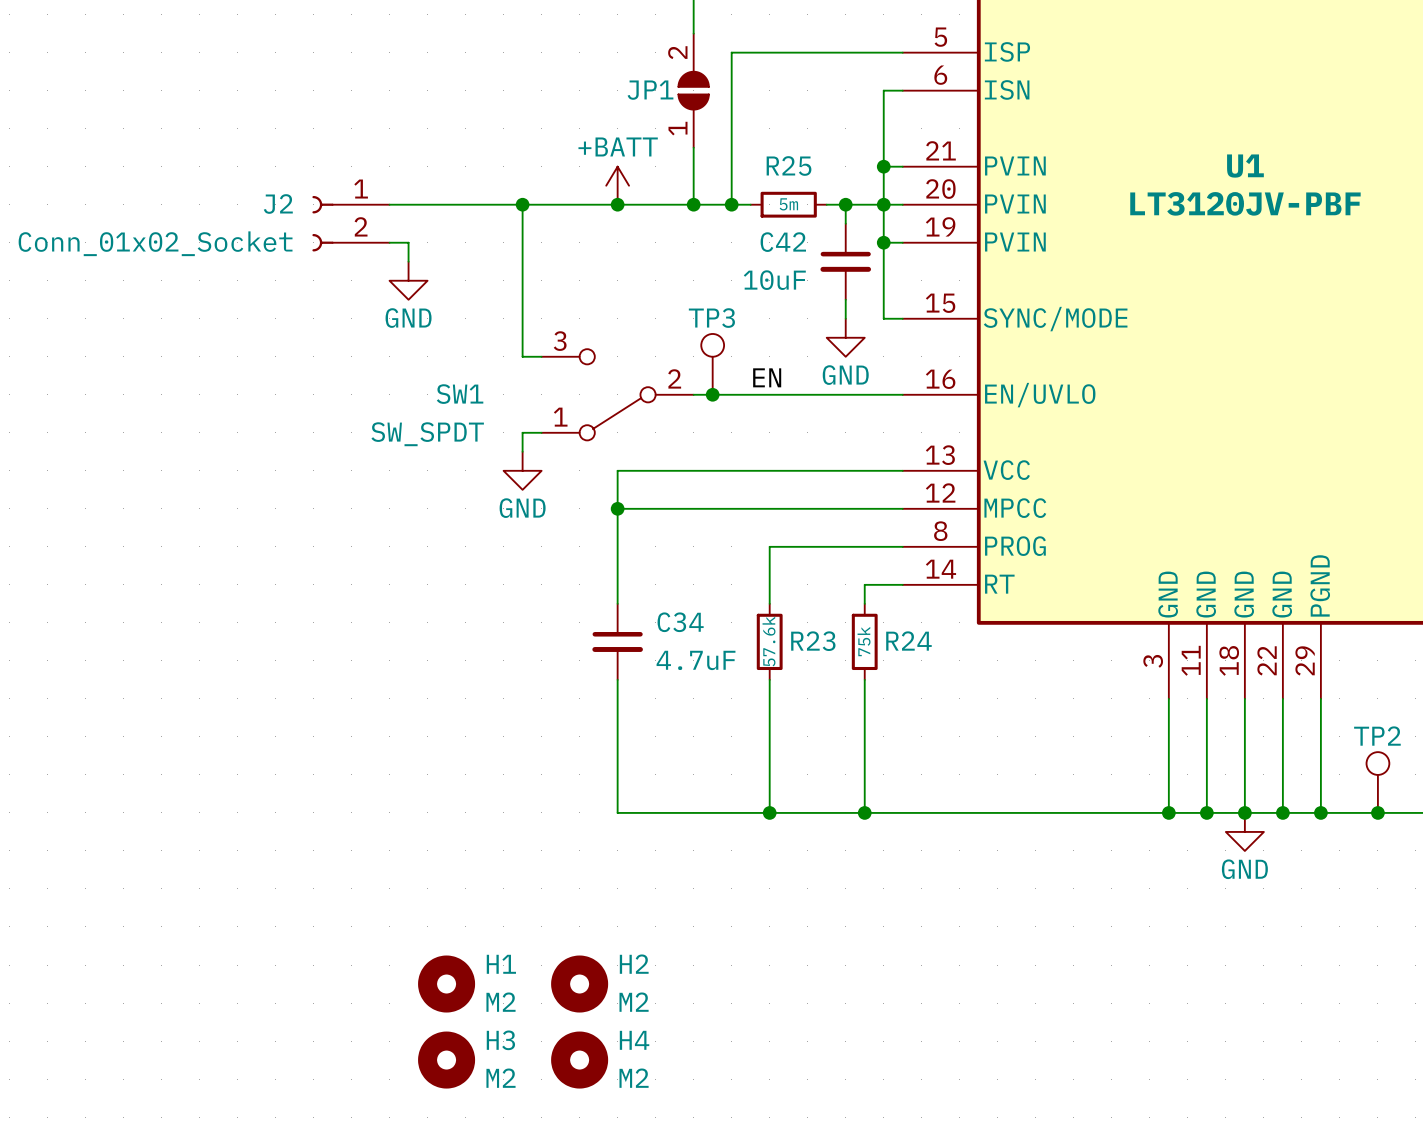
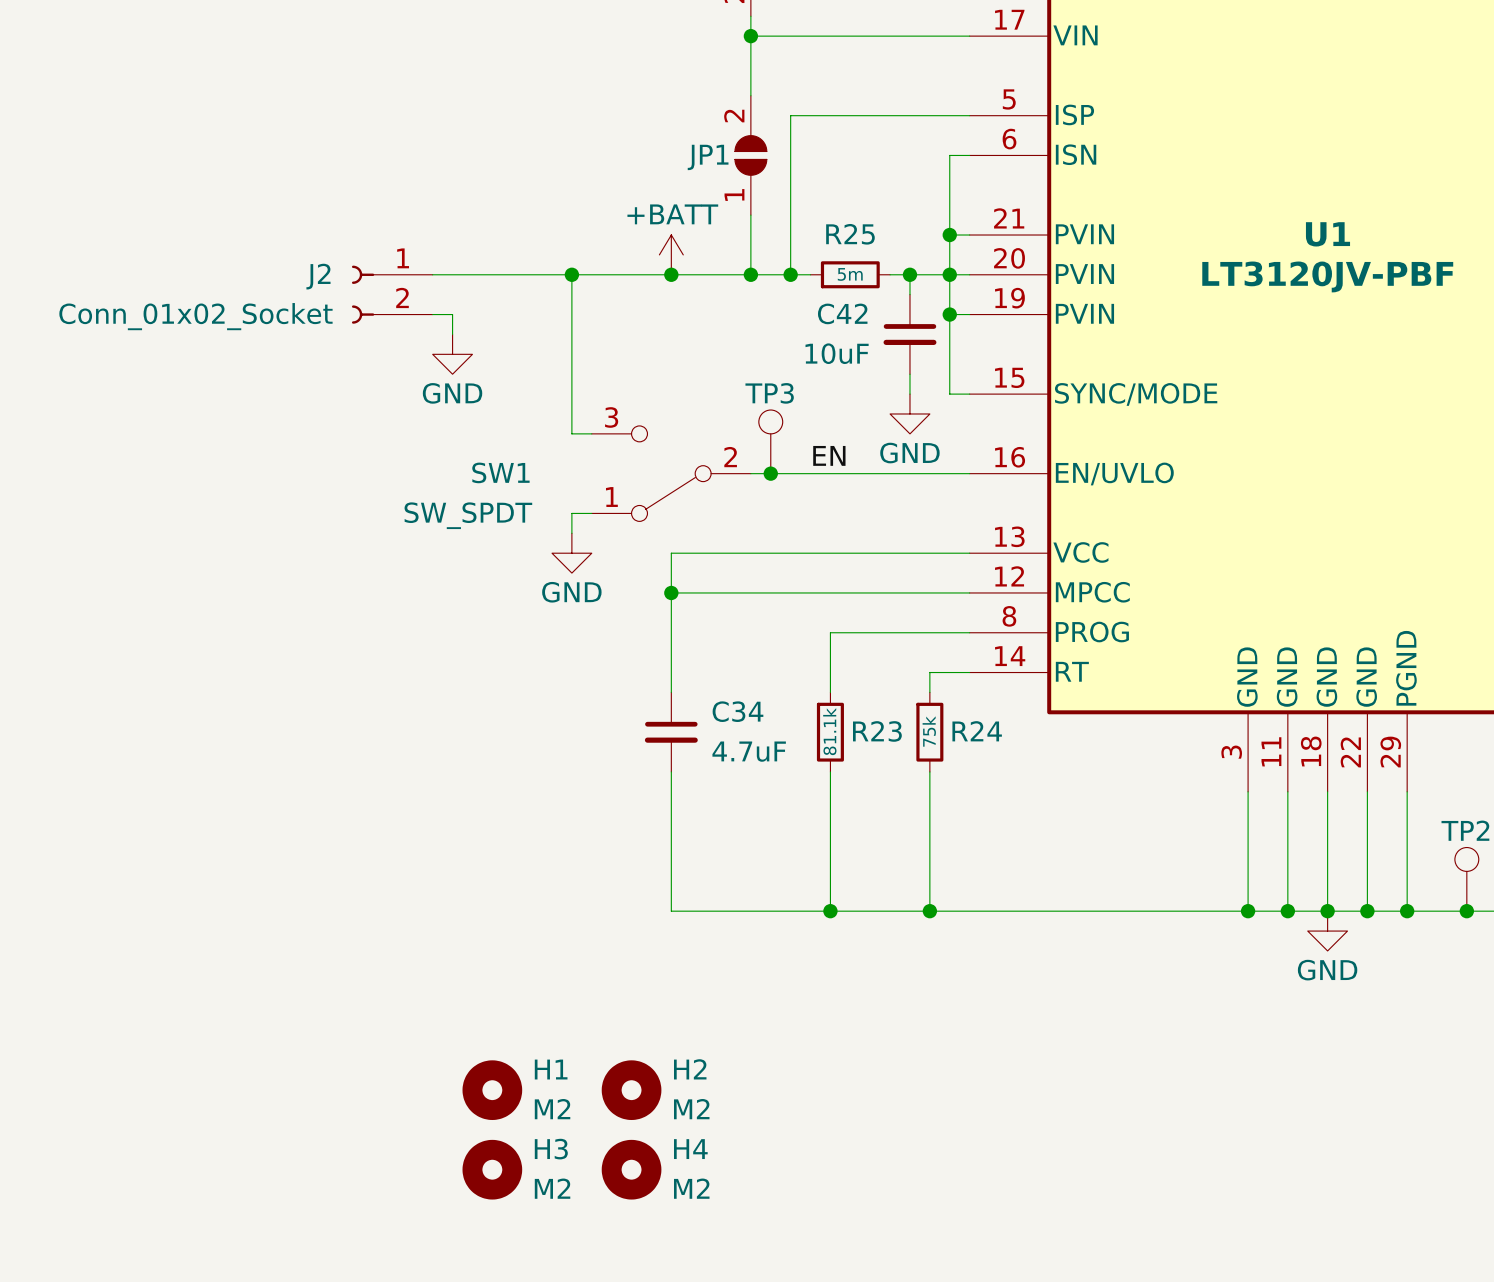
R23 value: 57.6k (768, 641) -> 81.1k (829, 731)

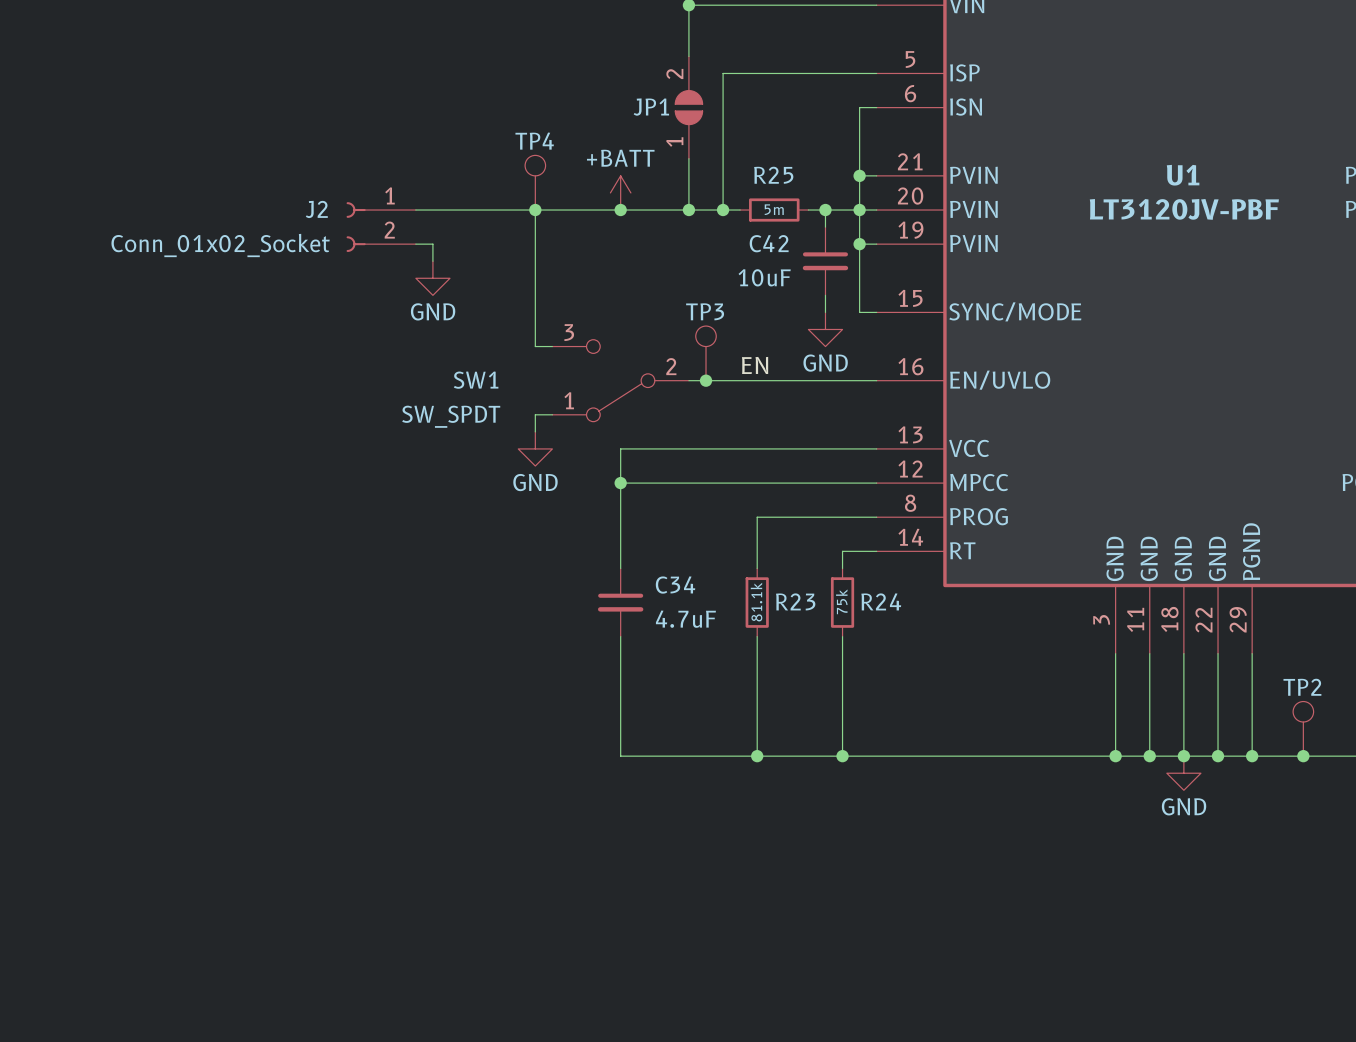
TP4: none -> (535, 182)
H1: M2 (492, 1090) -> none
H2: M2 (631, 1090) -> none
H3: M2 (492, 1169) -> none
H4: M2 (631, 1169) -> none

